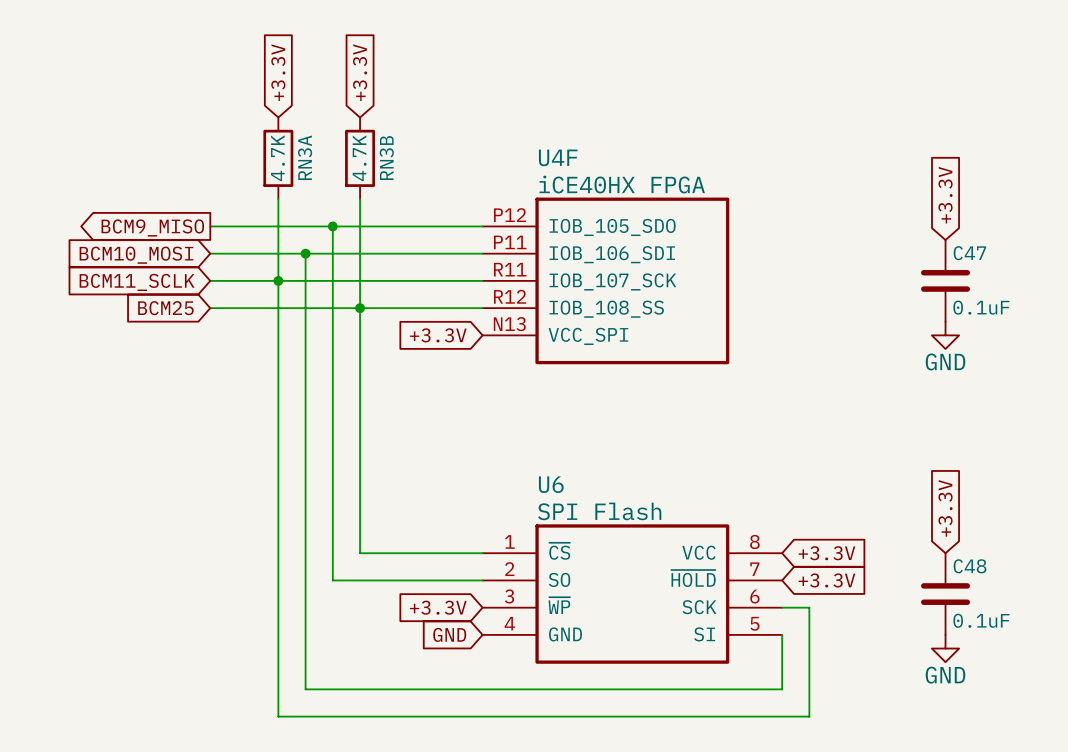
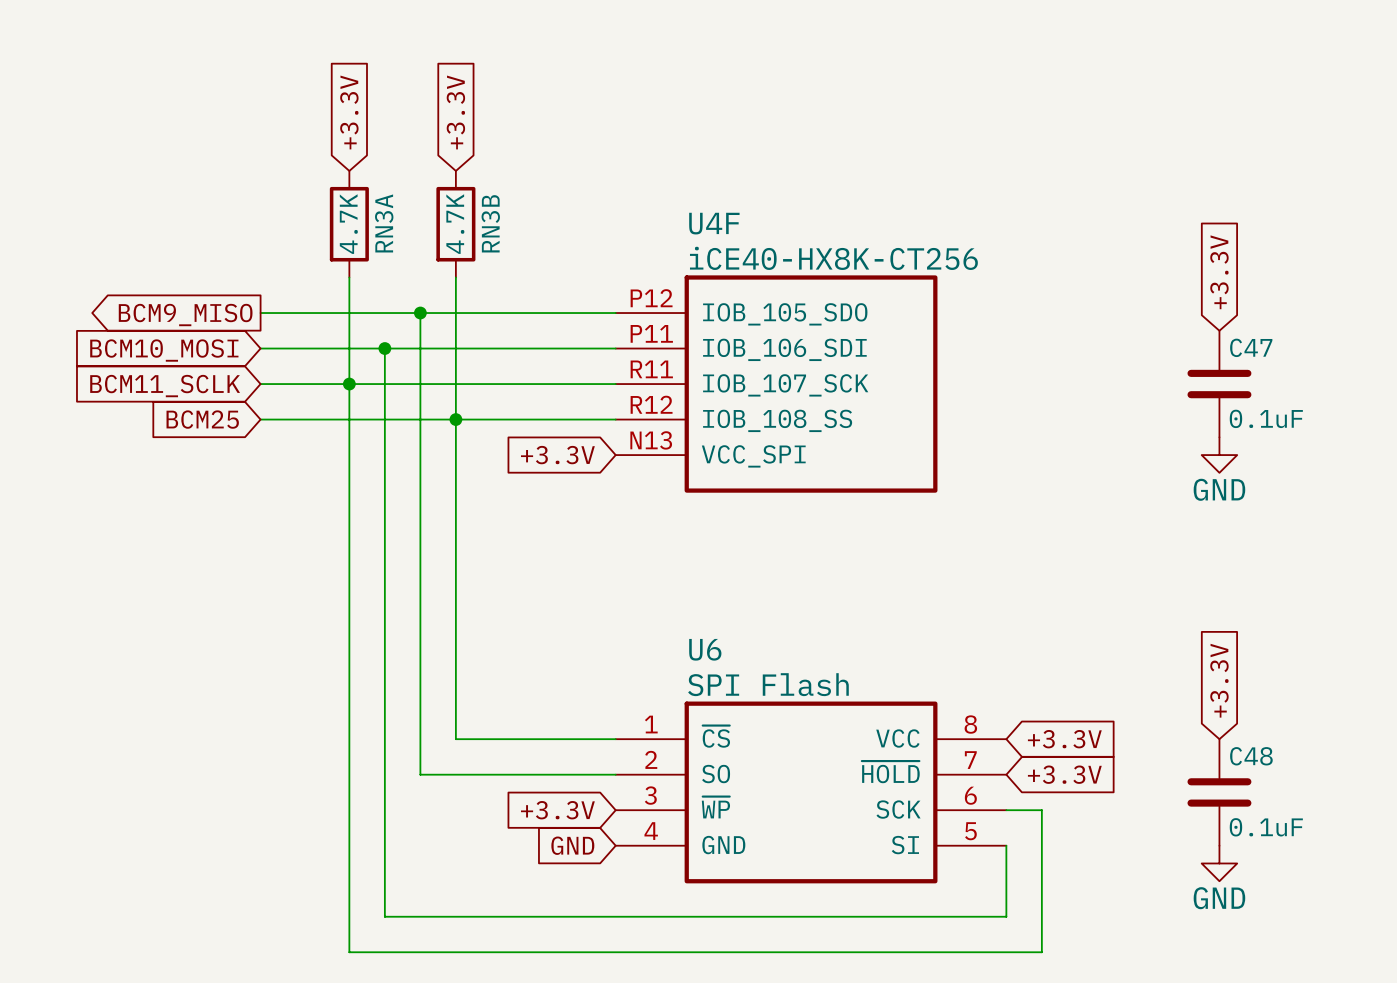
U4F value: iCE40HX FPGA (622, 184) -> iCE40-HX8K-CT256 (833, 258)

